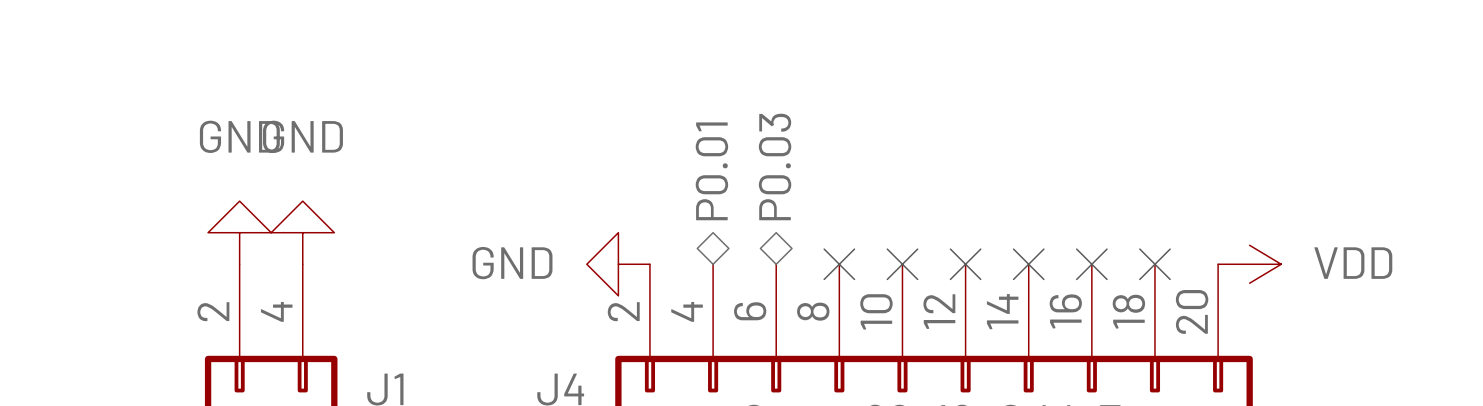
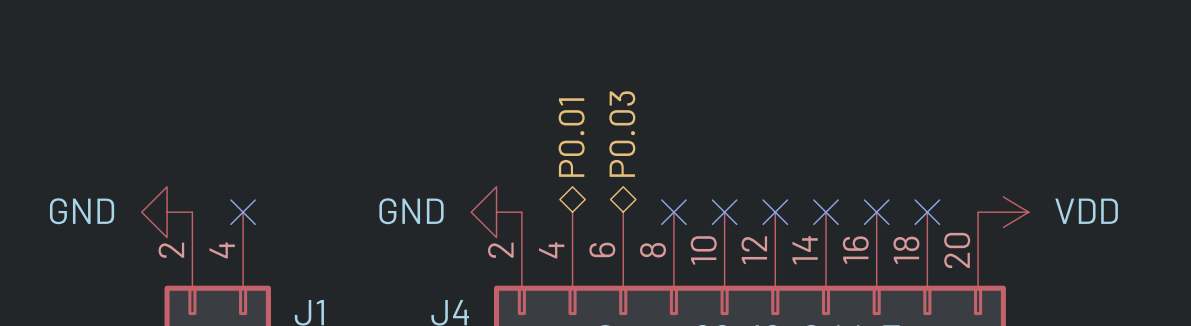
power symbol rotation: 0° (239, 232) -> 90° counterclockwise (167, 212)
power symbol position: GND (239, 232) -> GND (167, 212)
power symbol: GND (302, 232) -> none
no-connect mark: none -> (243, 212)

